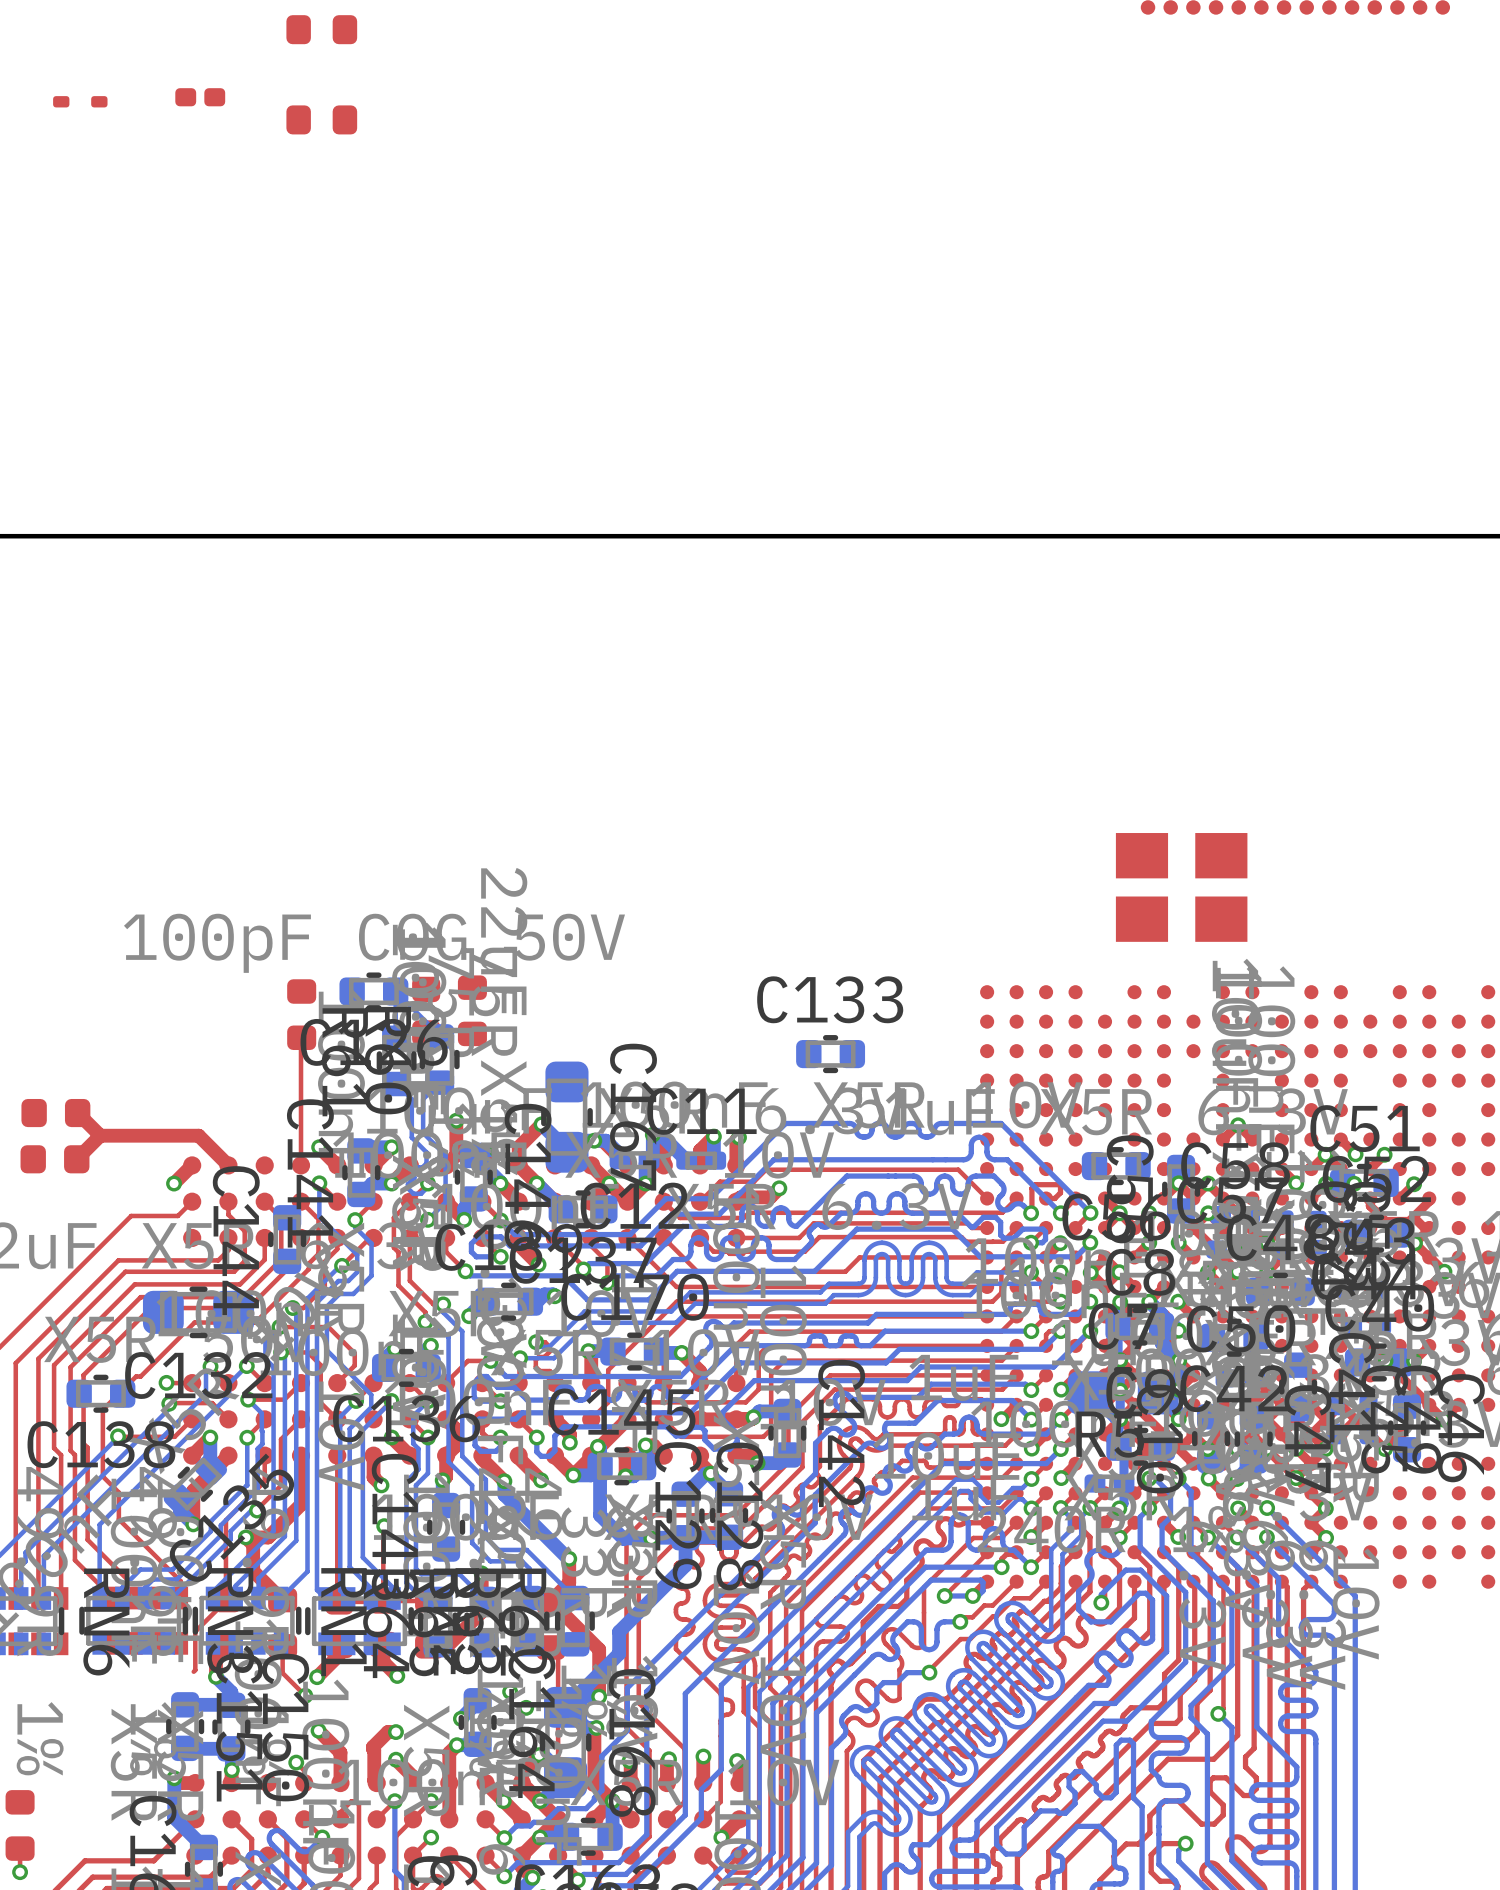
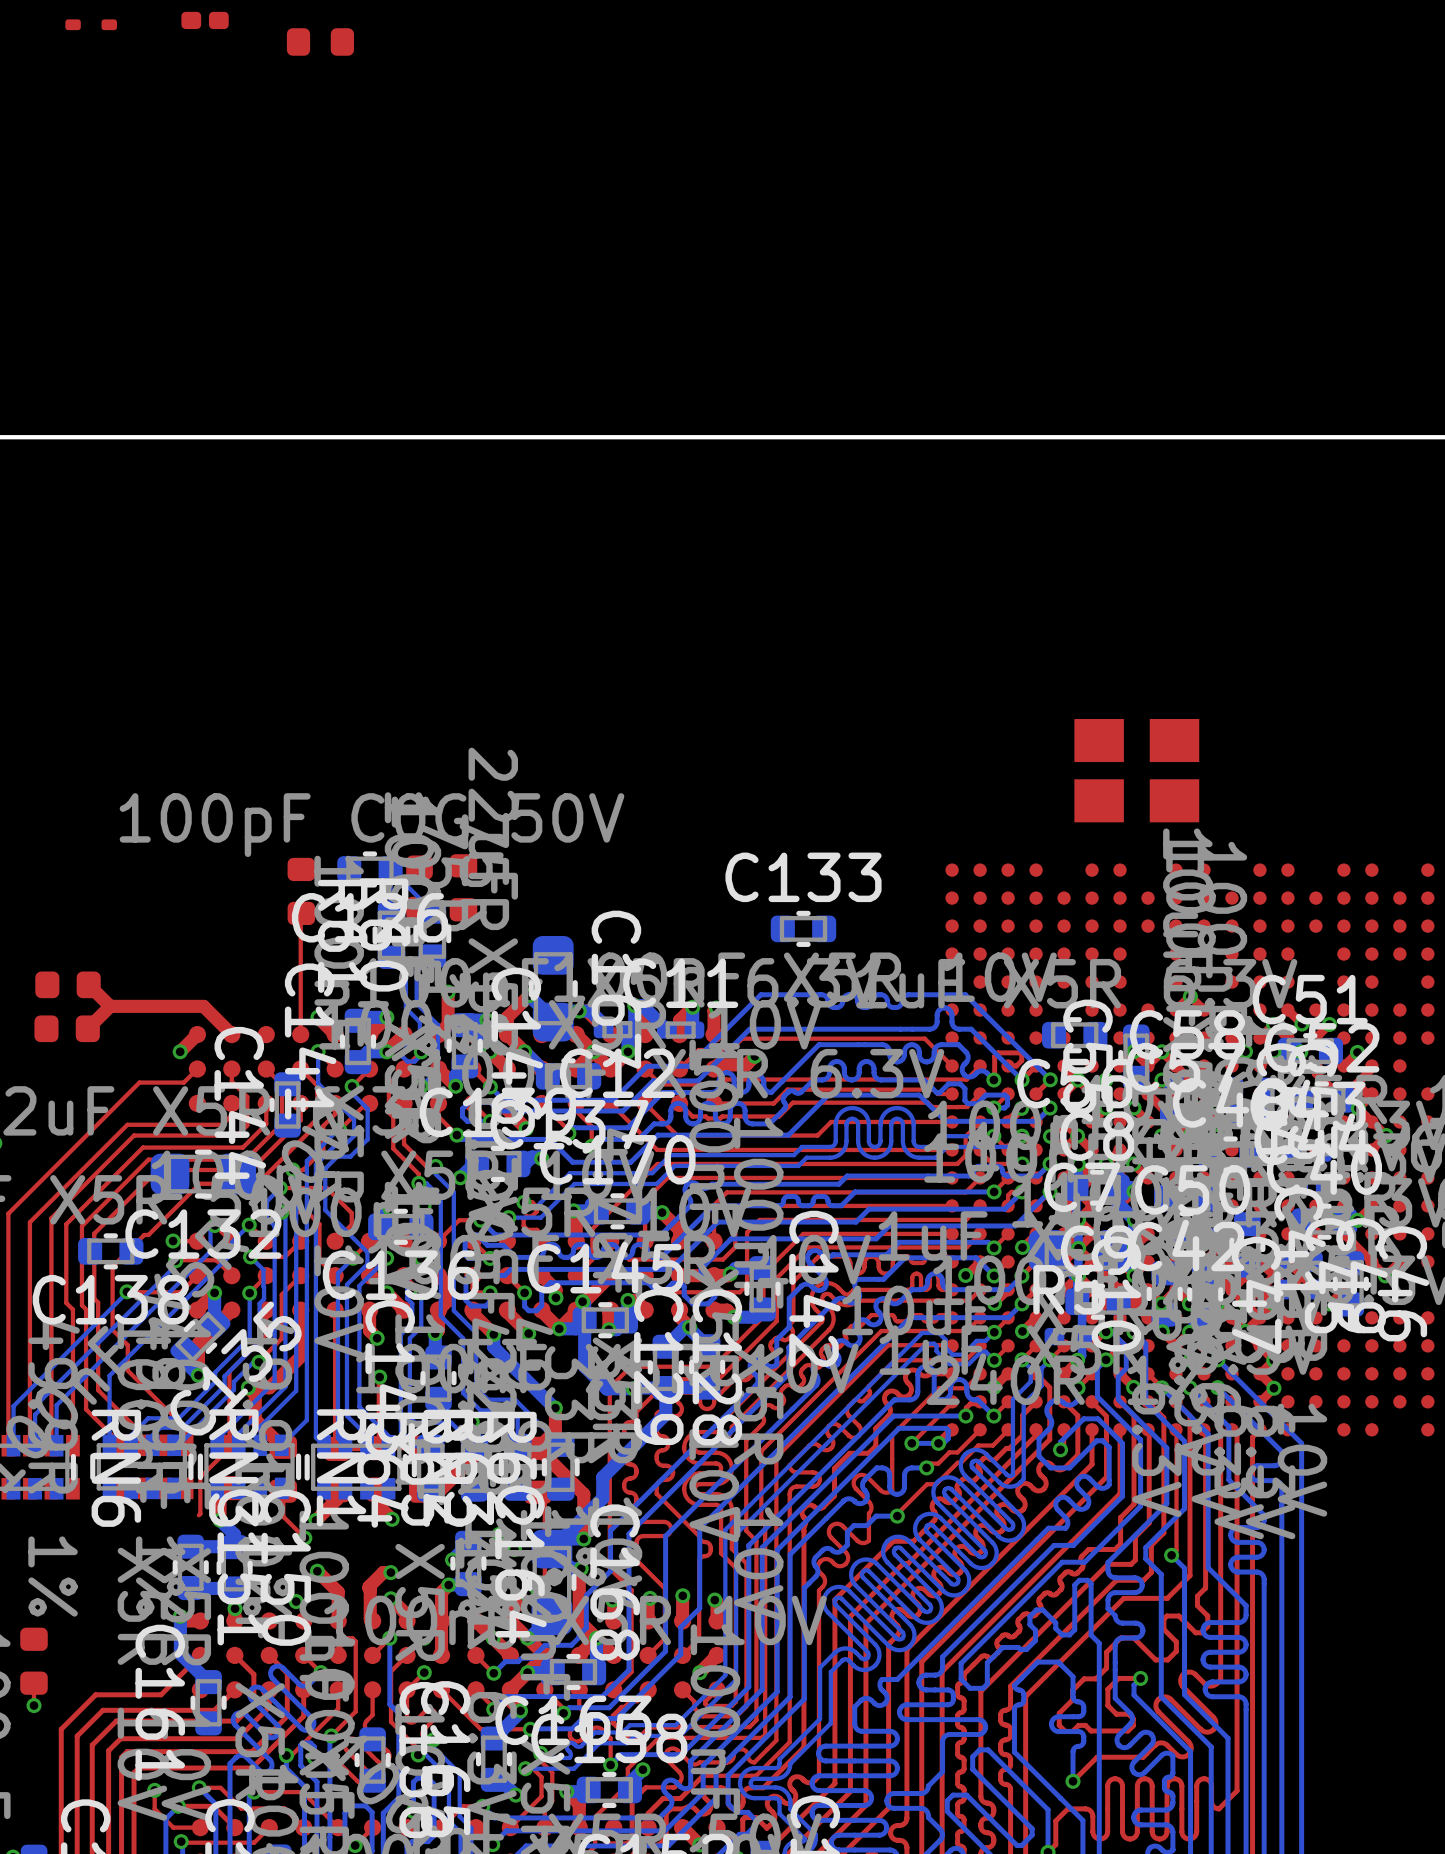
top track: (654, 1562) (638, 1578) (638, 1703) (654, 1718) -> (636, 1411) (635, 1419) (626, 1423) (624, 1427) (625, 1433) (634, 1437) (636, 1442) (634, 1448) (627, 1451) (624, 1455) (625, 1462) (634, 1465) (636, 1470) (634, 1476) (627, 1479) (624, 1483) (625, 1489) (634, 1494) (636, 1500) (634, 1505) (625, 1509) (624, 1517) (629, 1521) (665, 1522) (669, 1524) (671, 1528) (669, 1533) (665, 1535) (642, 1536) (638, 1538) (636, 1542) (636, 1560)

